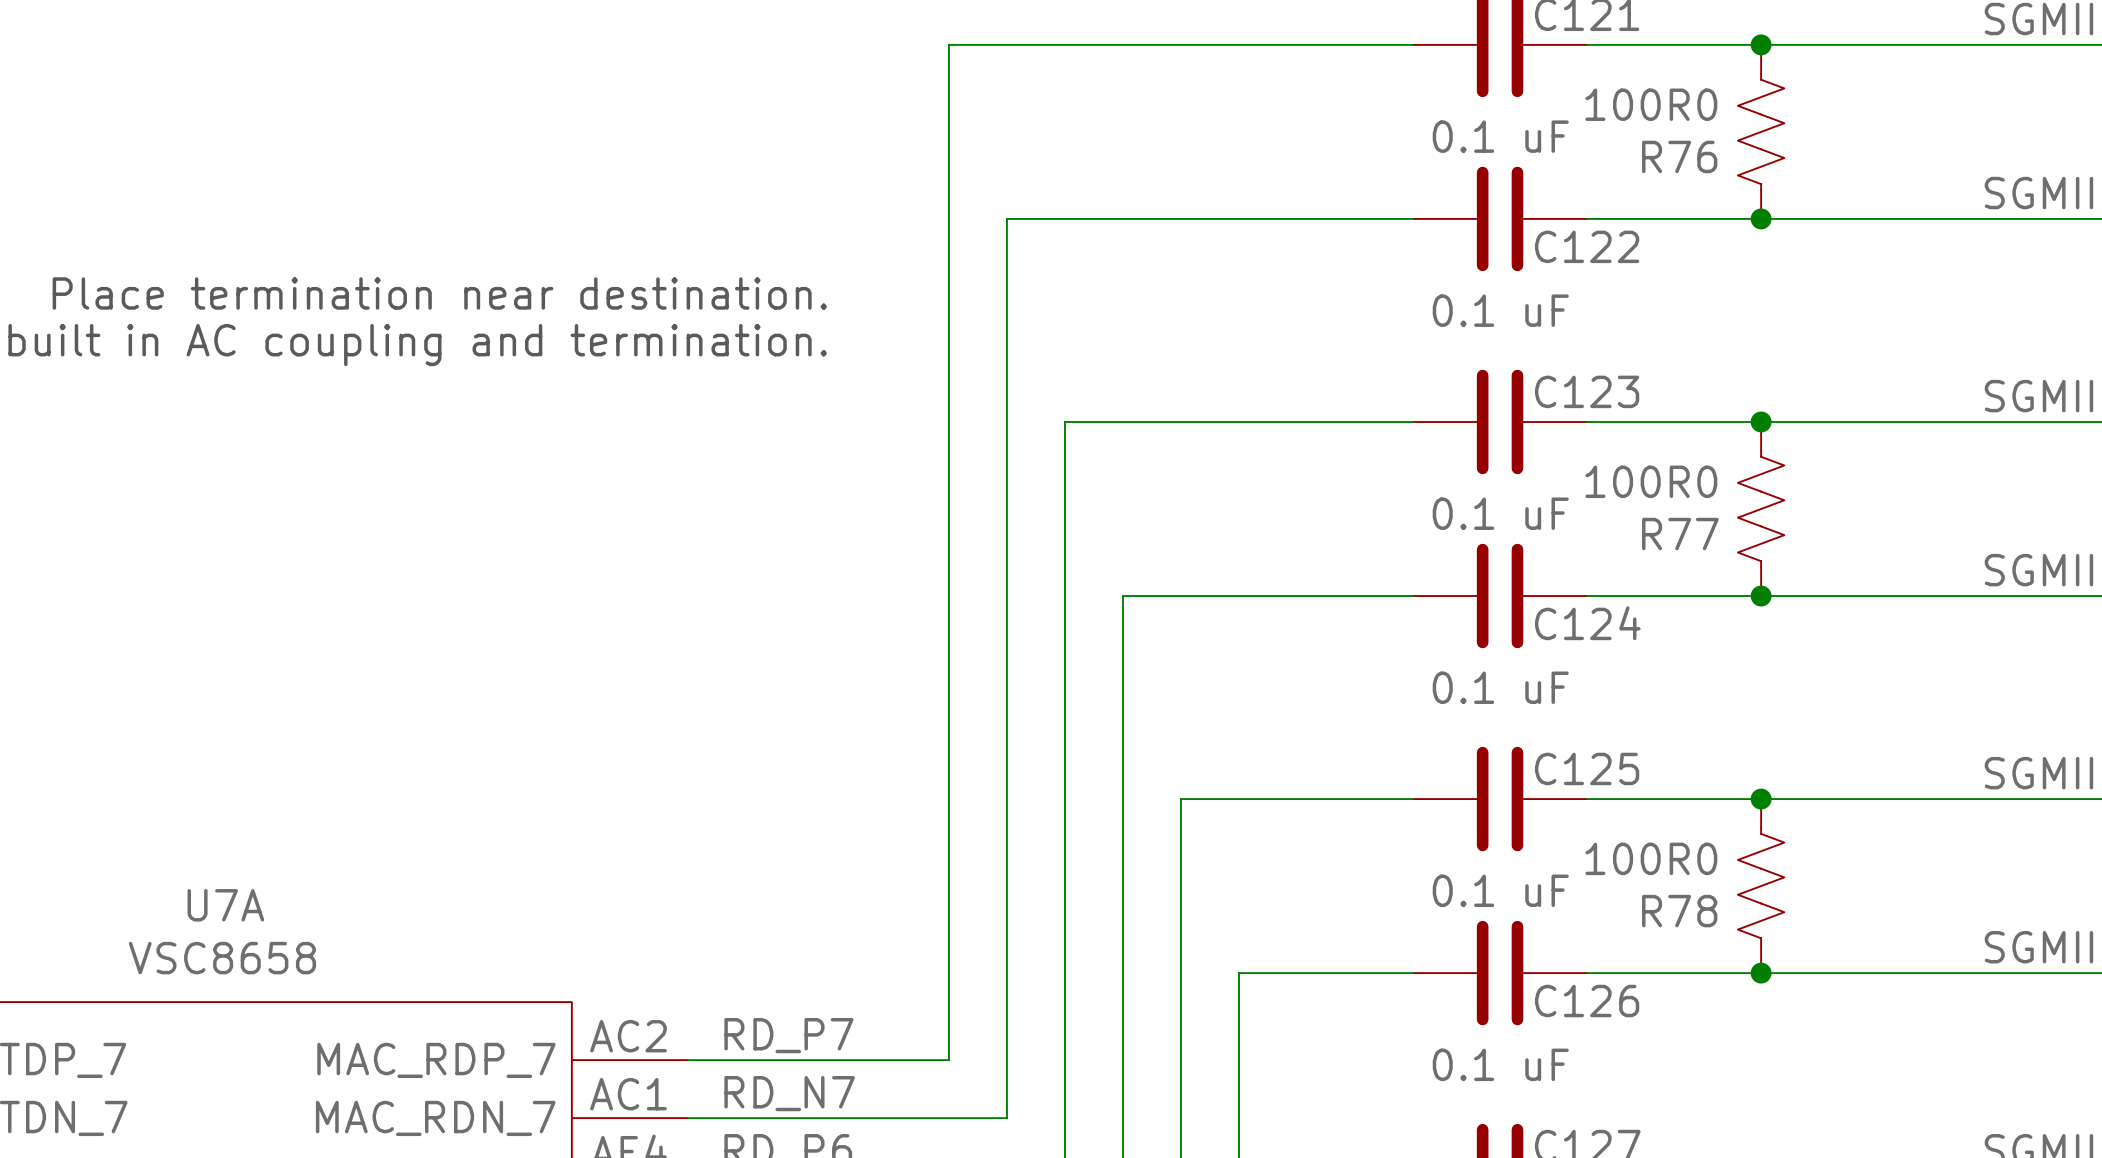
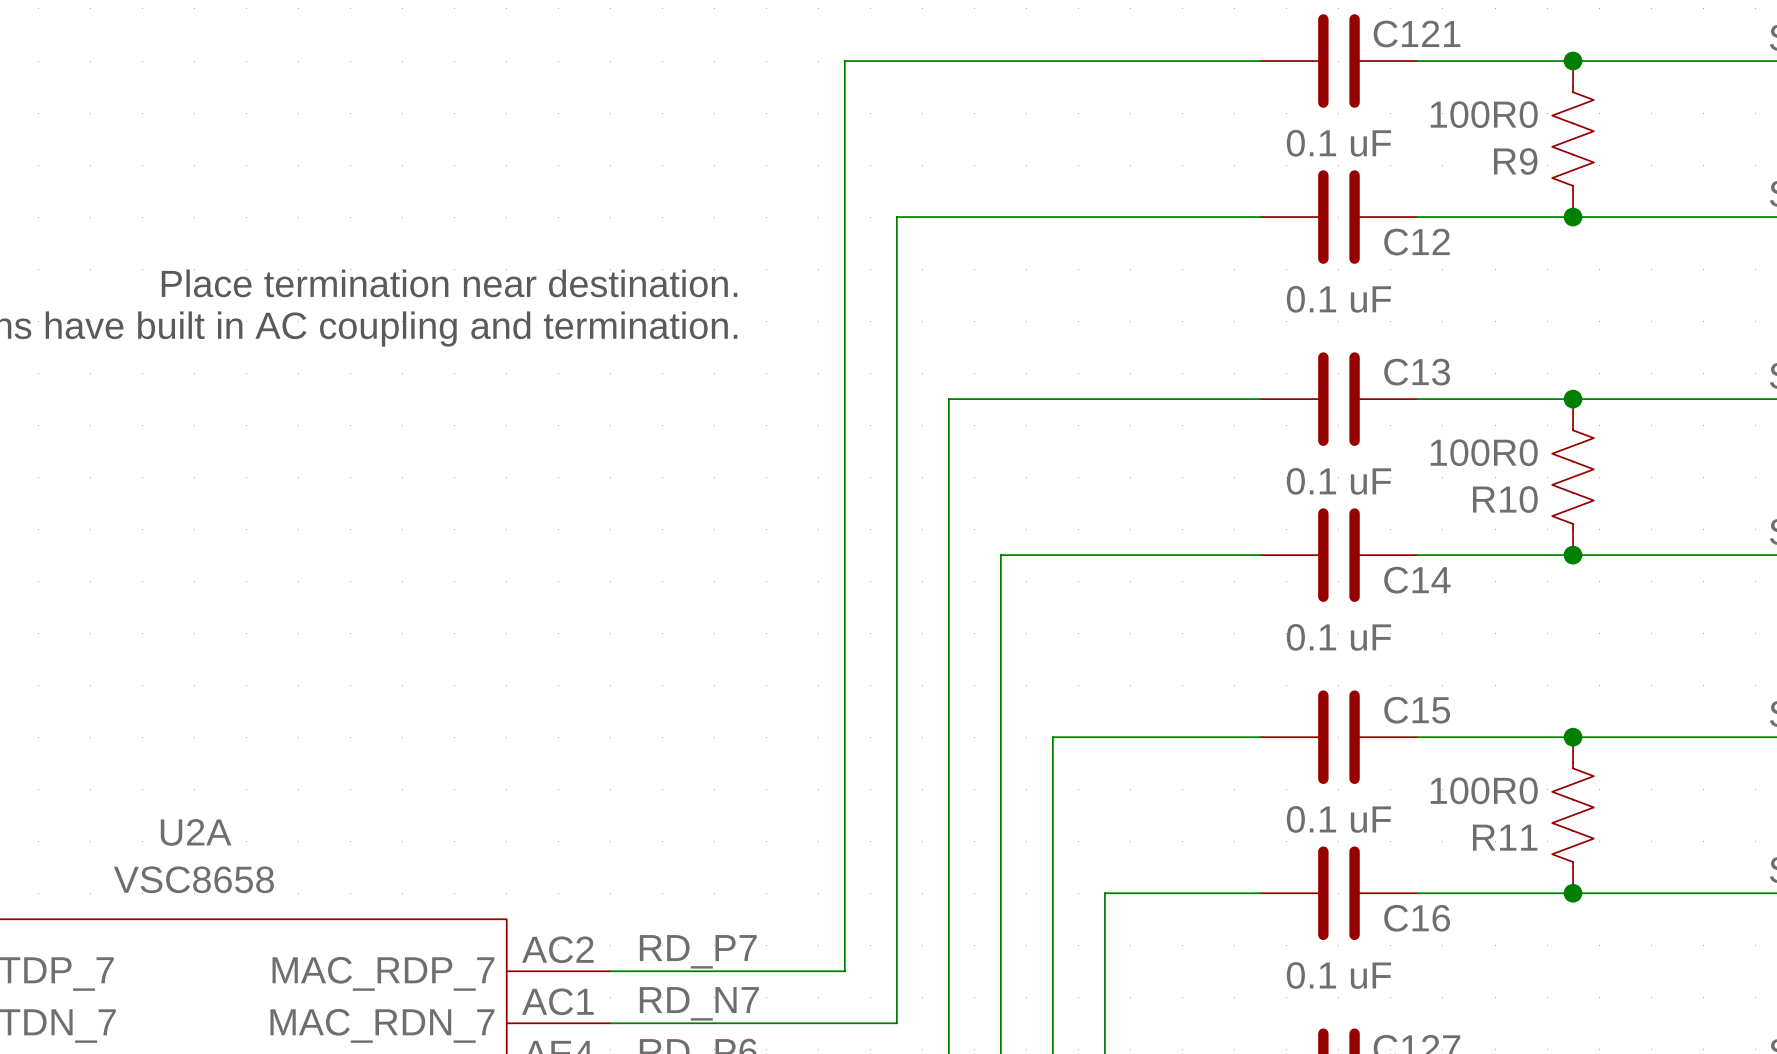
R76 name: R76 (1679, 156) -> R9 (1515, 161)
C122 name: C122 (1587, 246) -> C12 (1417, 242)
C123 name: C123 (1587, 391) -> C13 (1417, 372)
R77 name: R77 (1680, 534) -> R10 (1505, 499)
C124 name: C124 (1587, 623) -> C14 (1417, 580)
C125 name: C125 (1587, 768) -> C15 (1417, 710)
U7A name: U7A (225, 905) -> U2A (196, 832)
R78 name: R78 (1679, 911) -> R11 (1505, 837)
C126 name: C126 (1587, 1001) -> C16 (1417, 918)

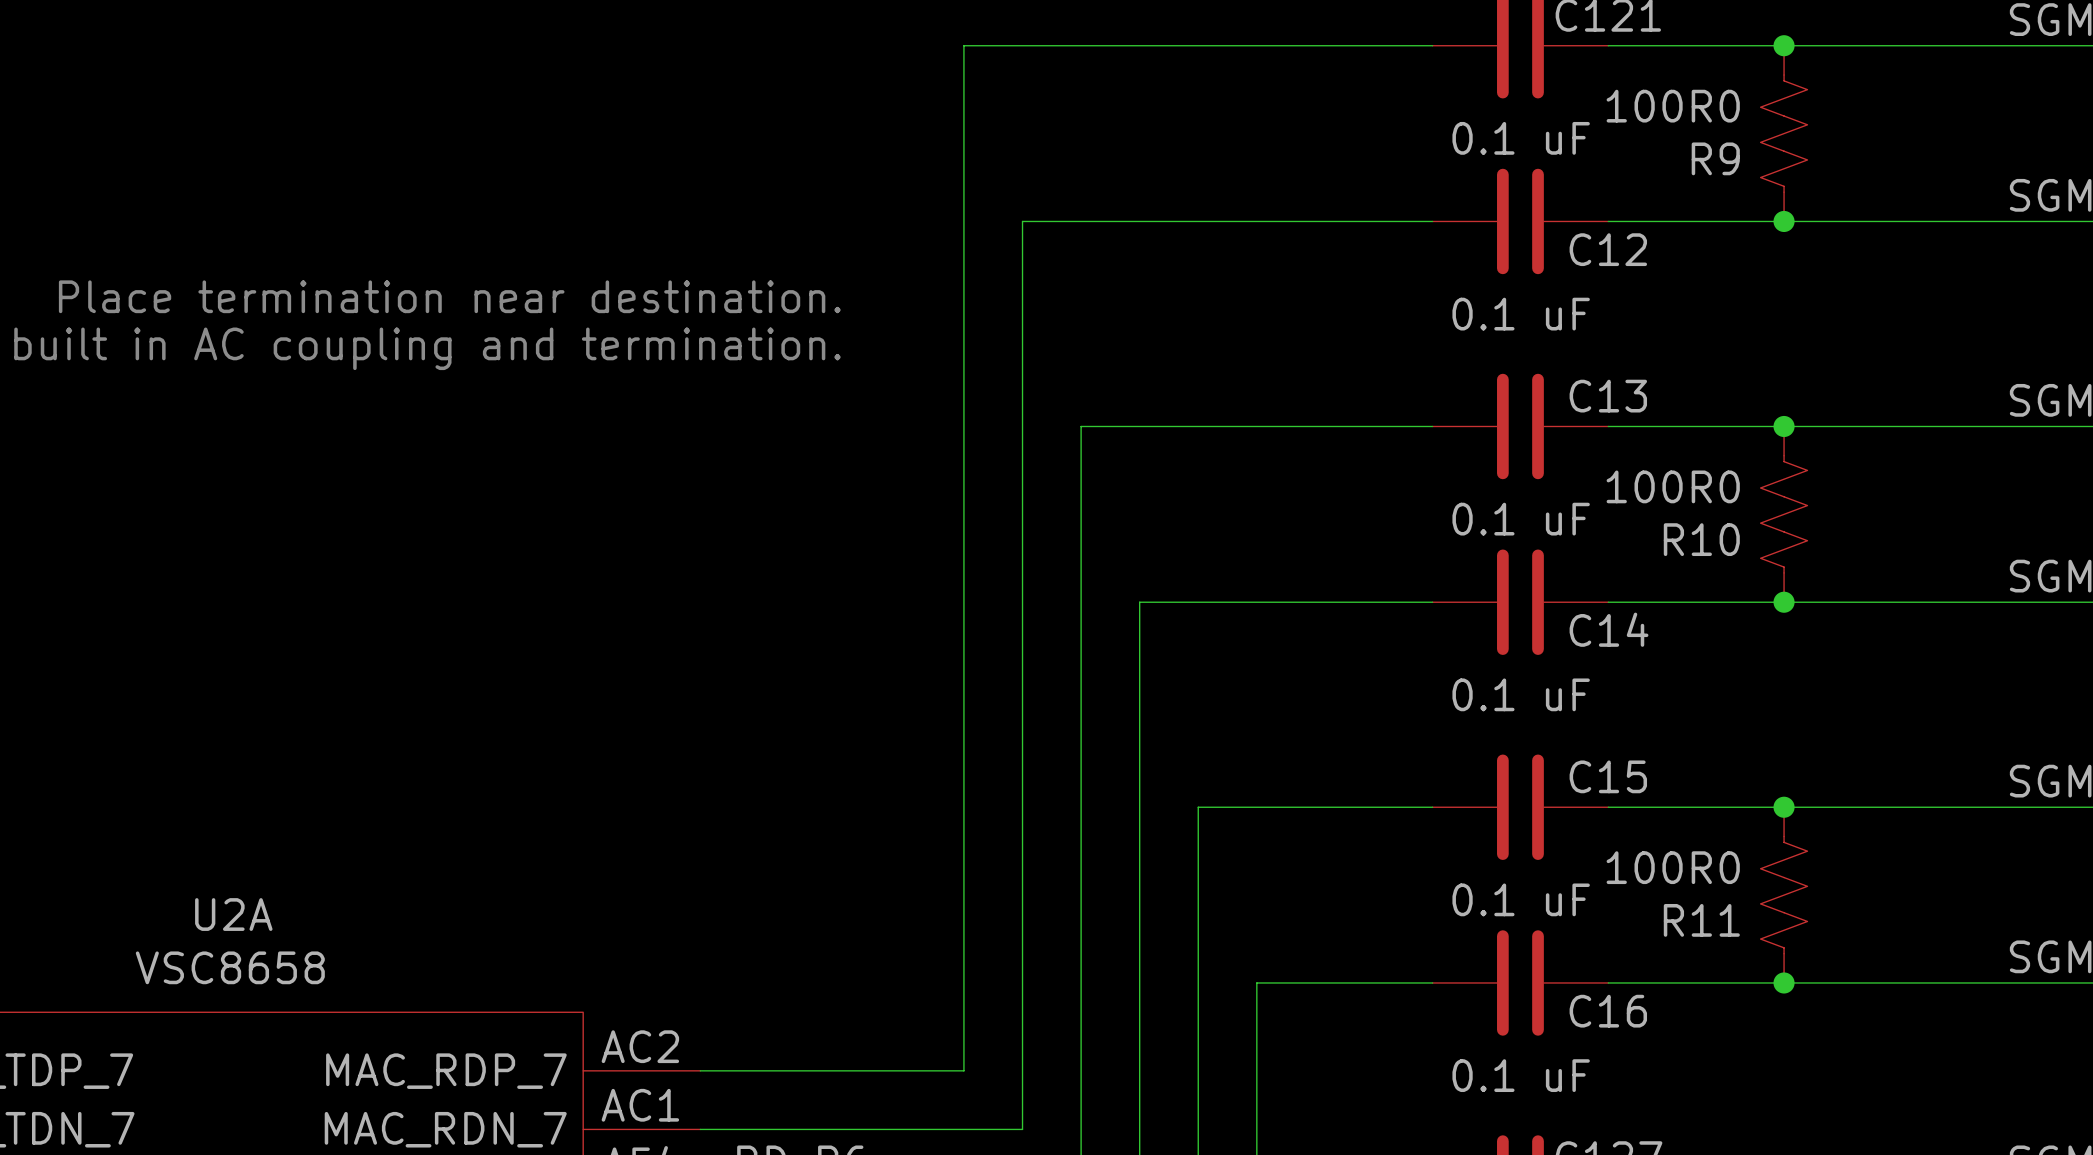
label: RD_P7 (698, 951) -> none
label: RD_N7 (699, 1003) -> none

